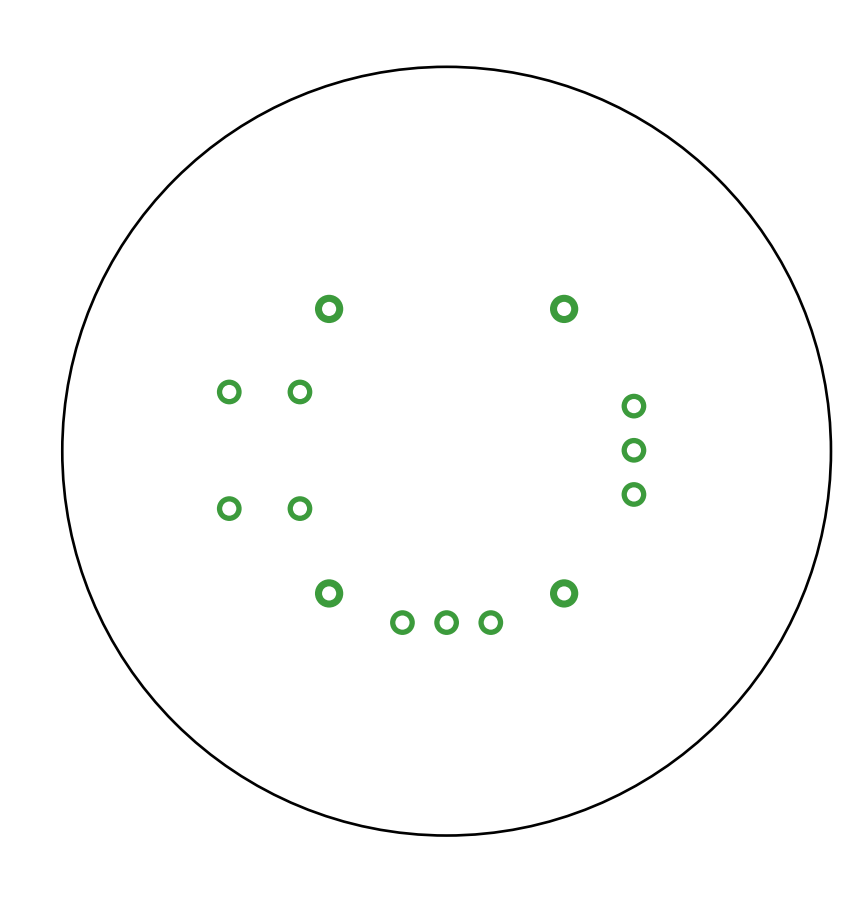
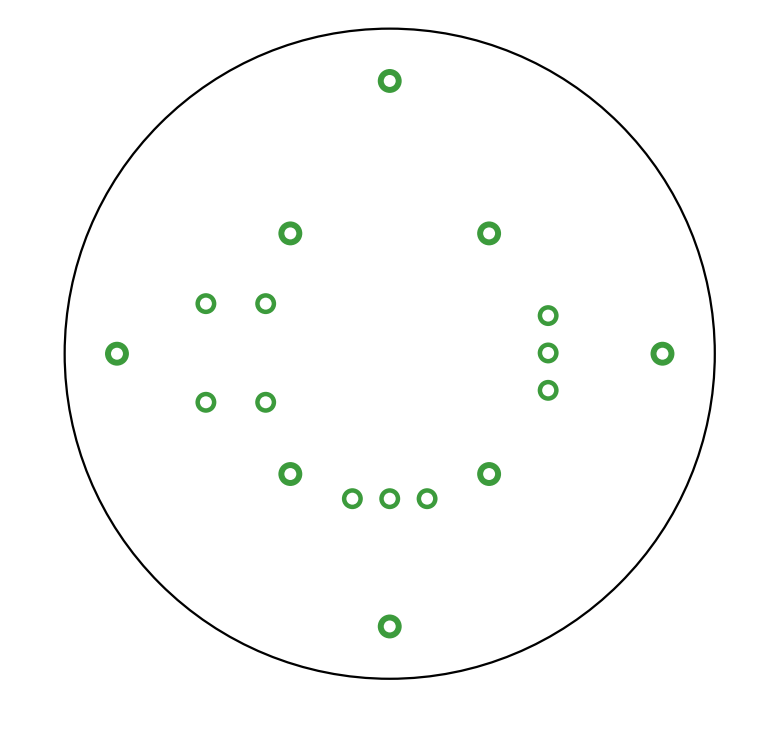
via: none -> (389, 80)
via: none -> (116, 353)
via: none -> (662, 353)
via: none -> (389, 626)

